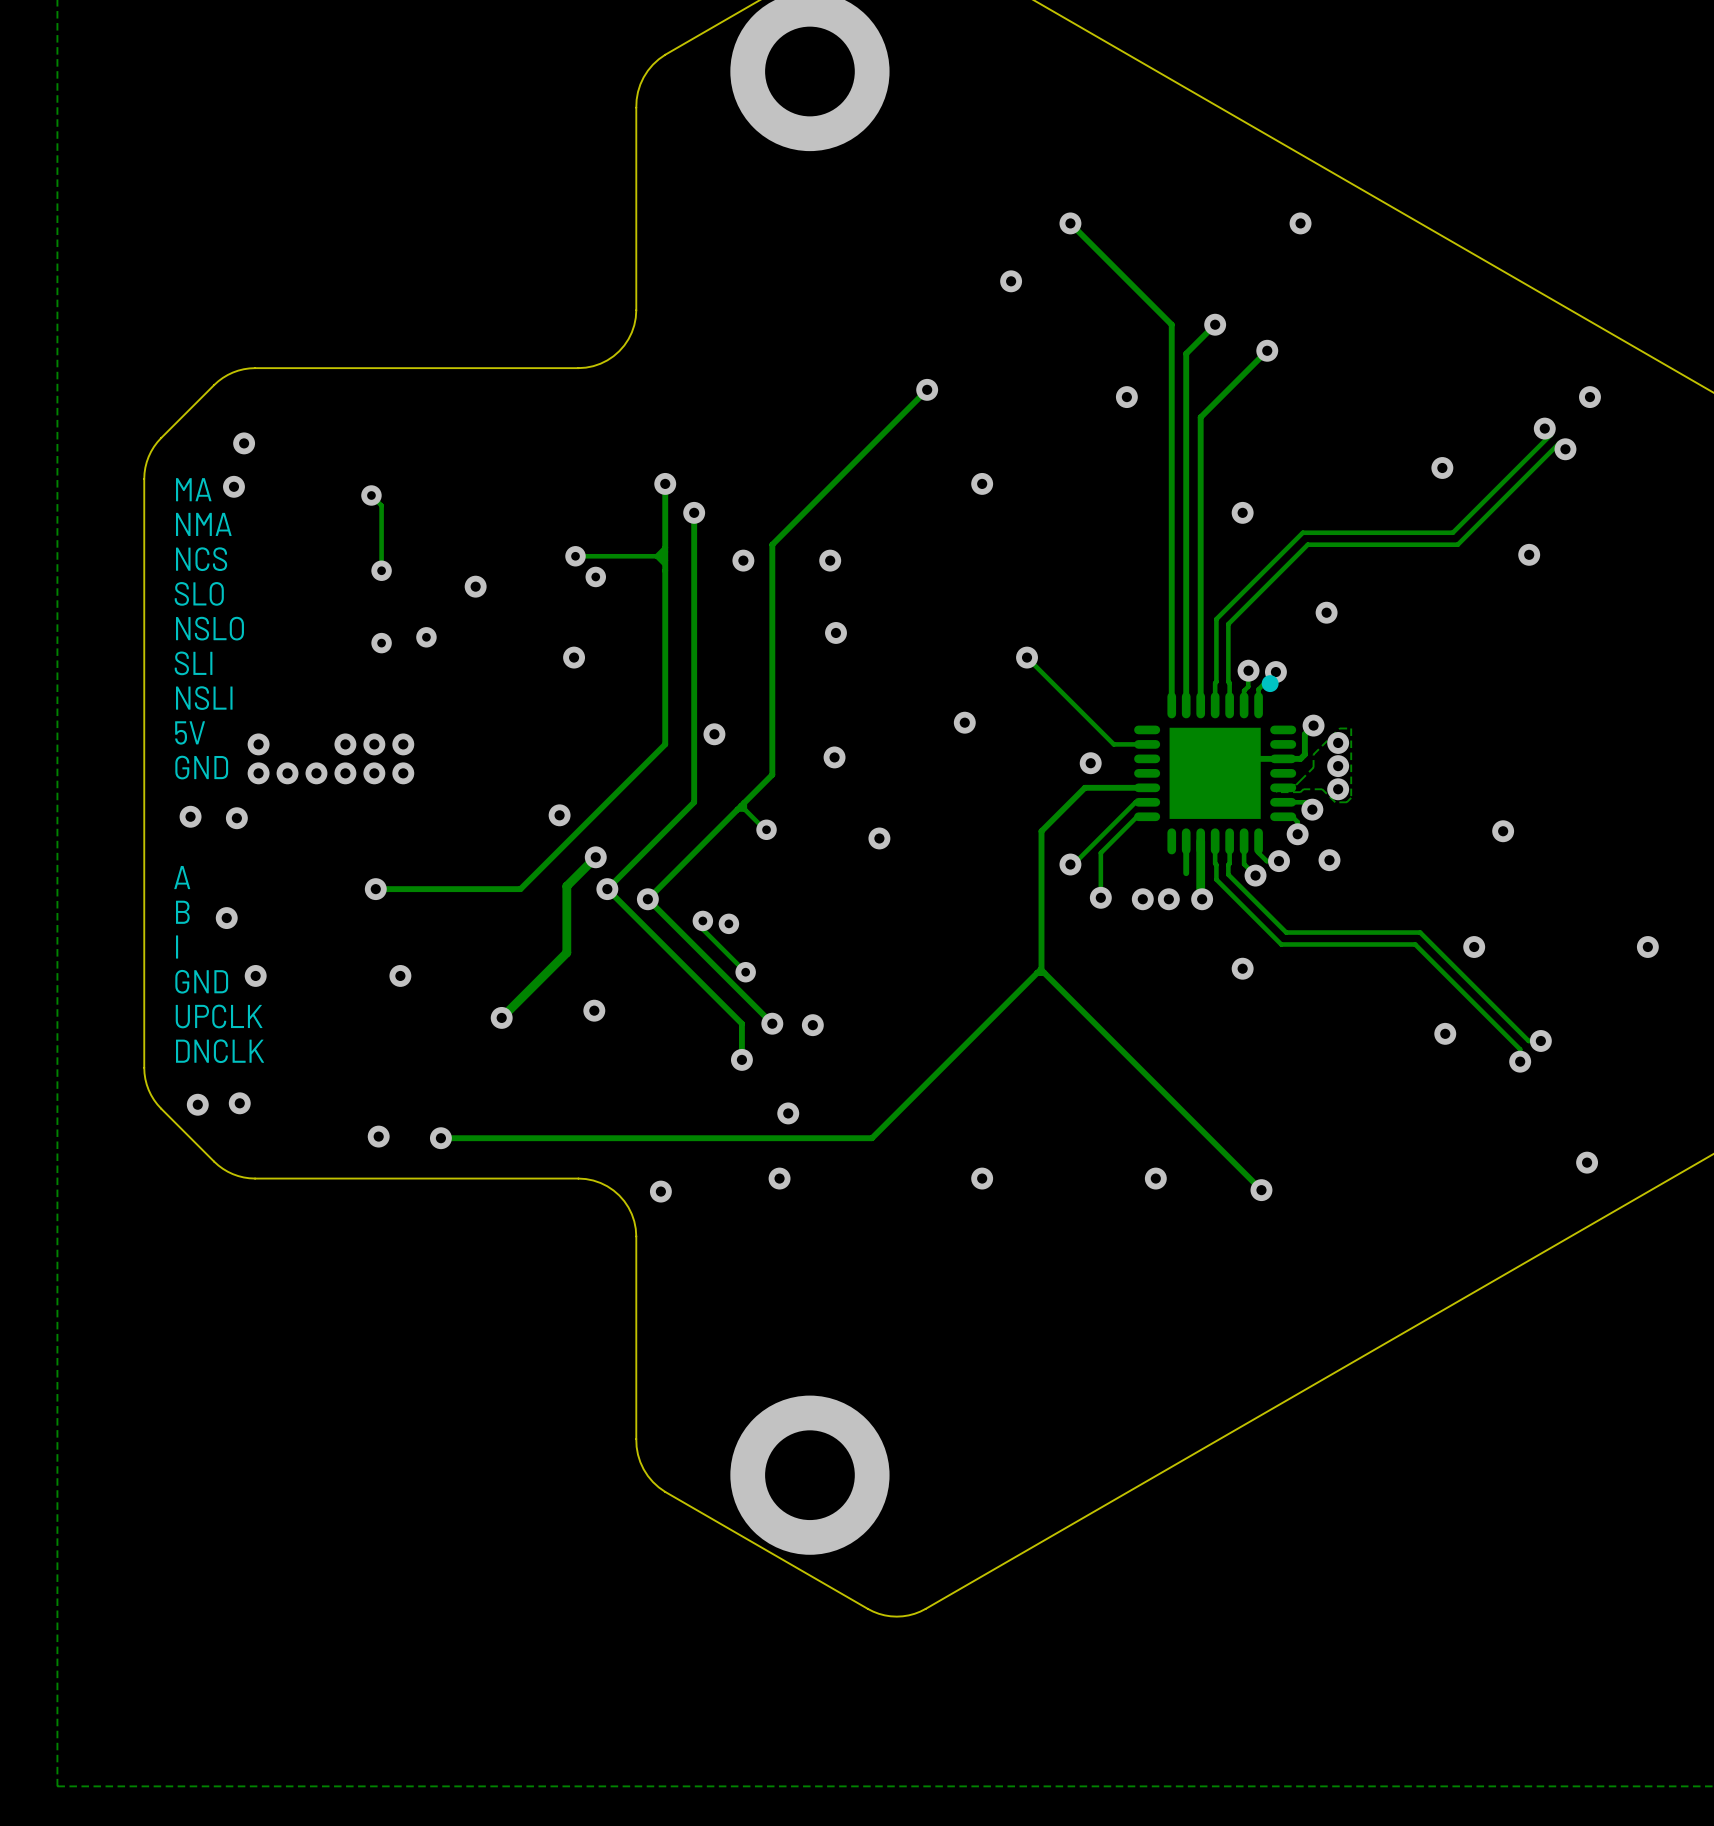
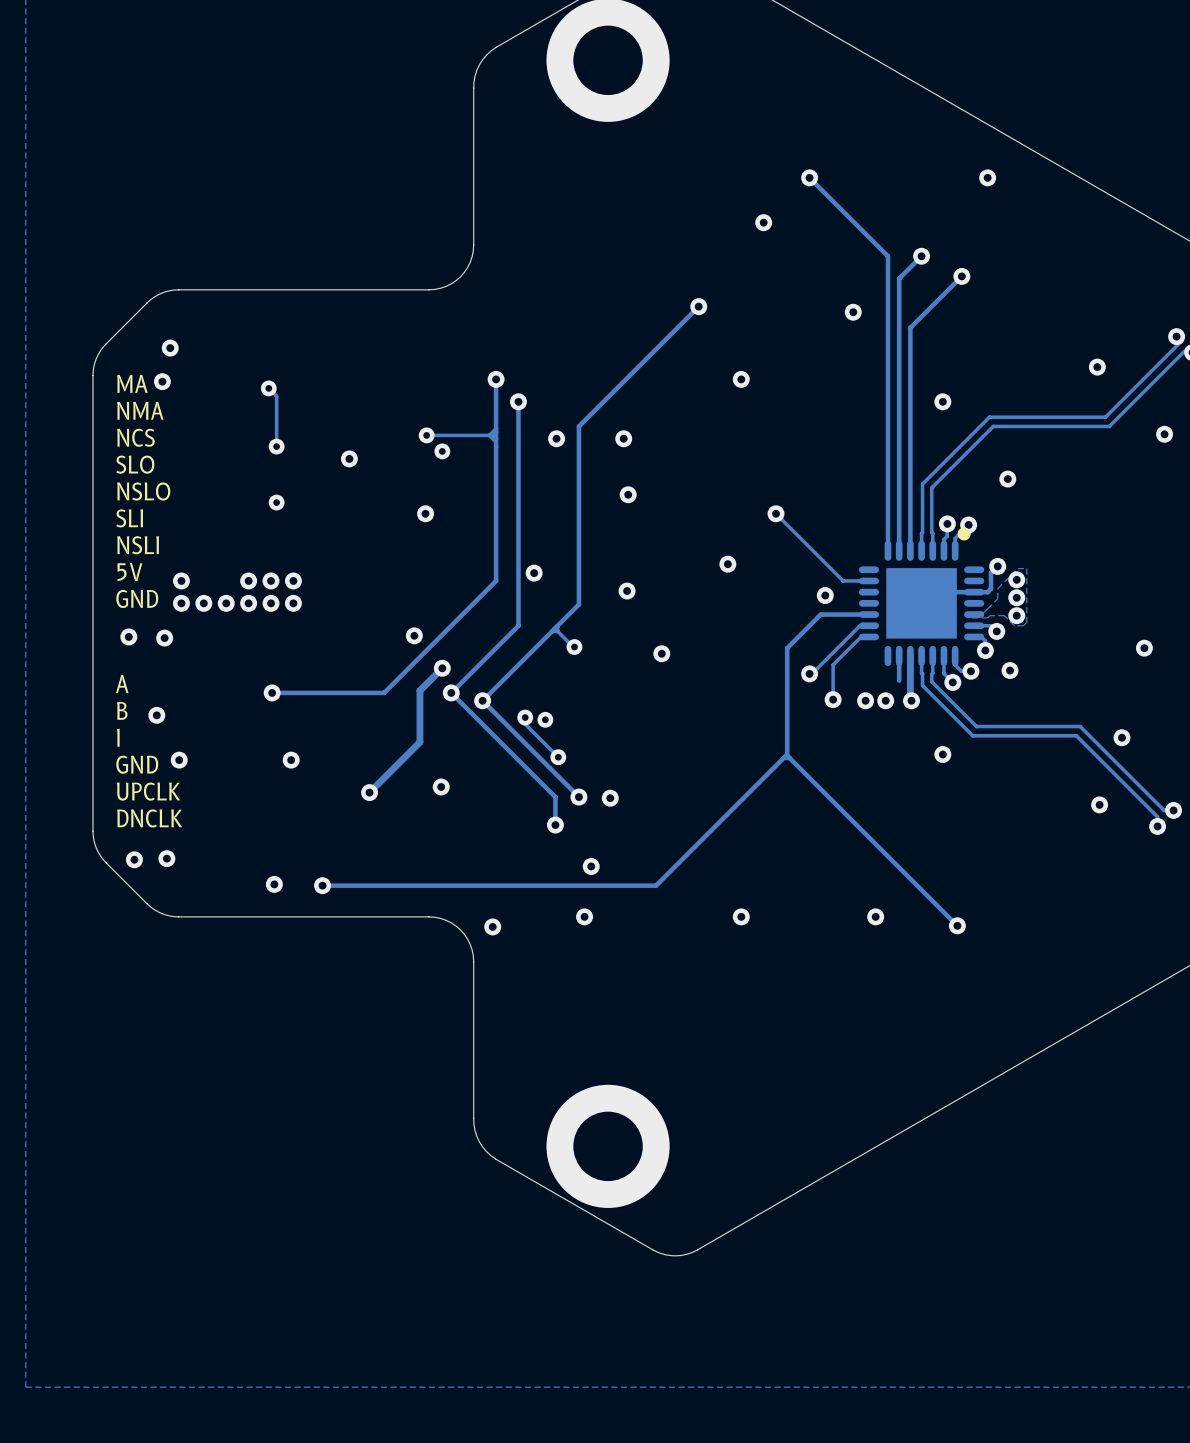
via: (426, 637) -> none

